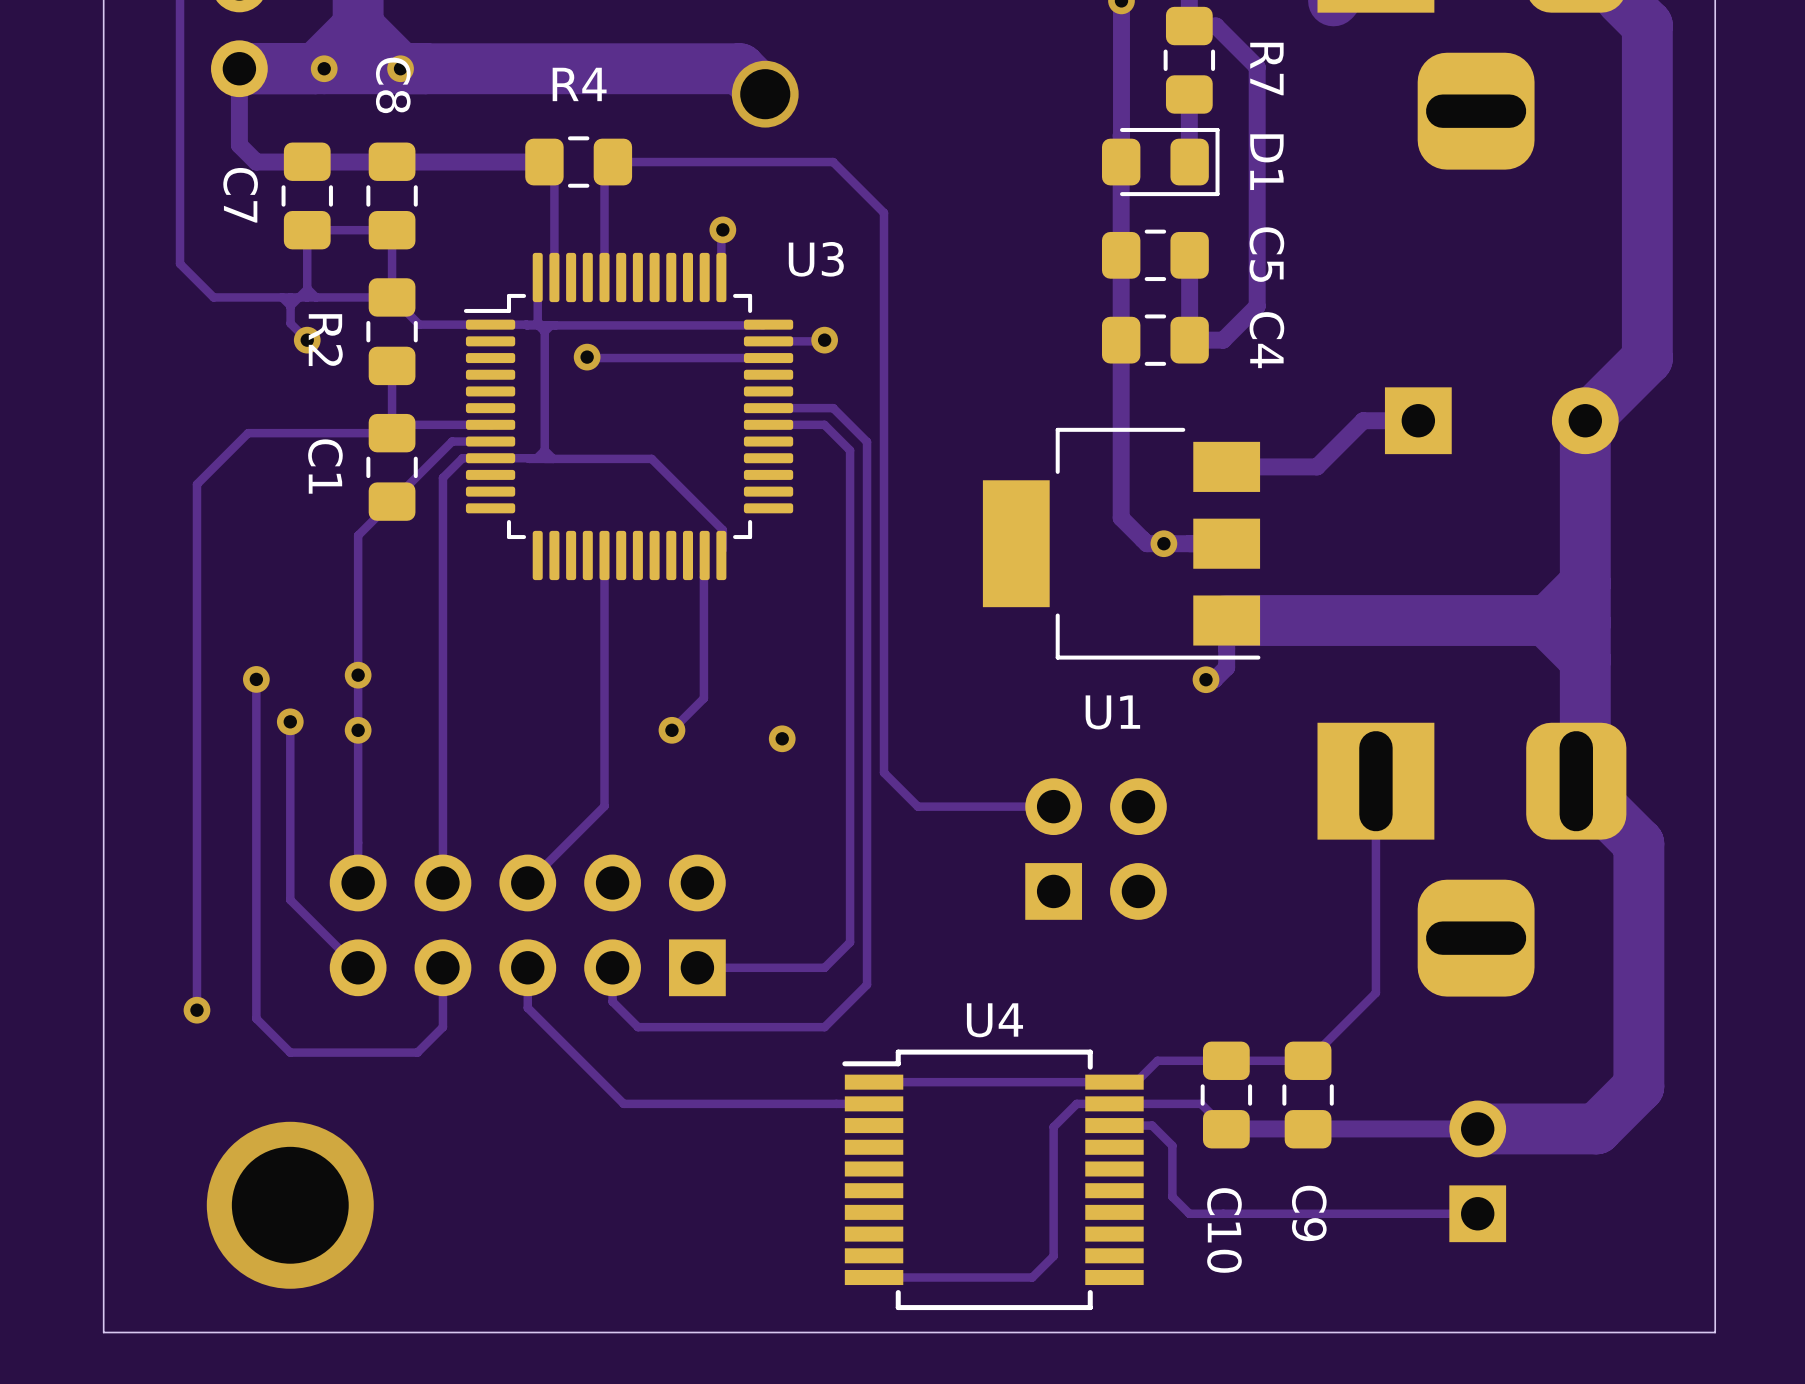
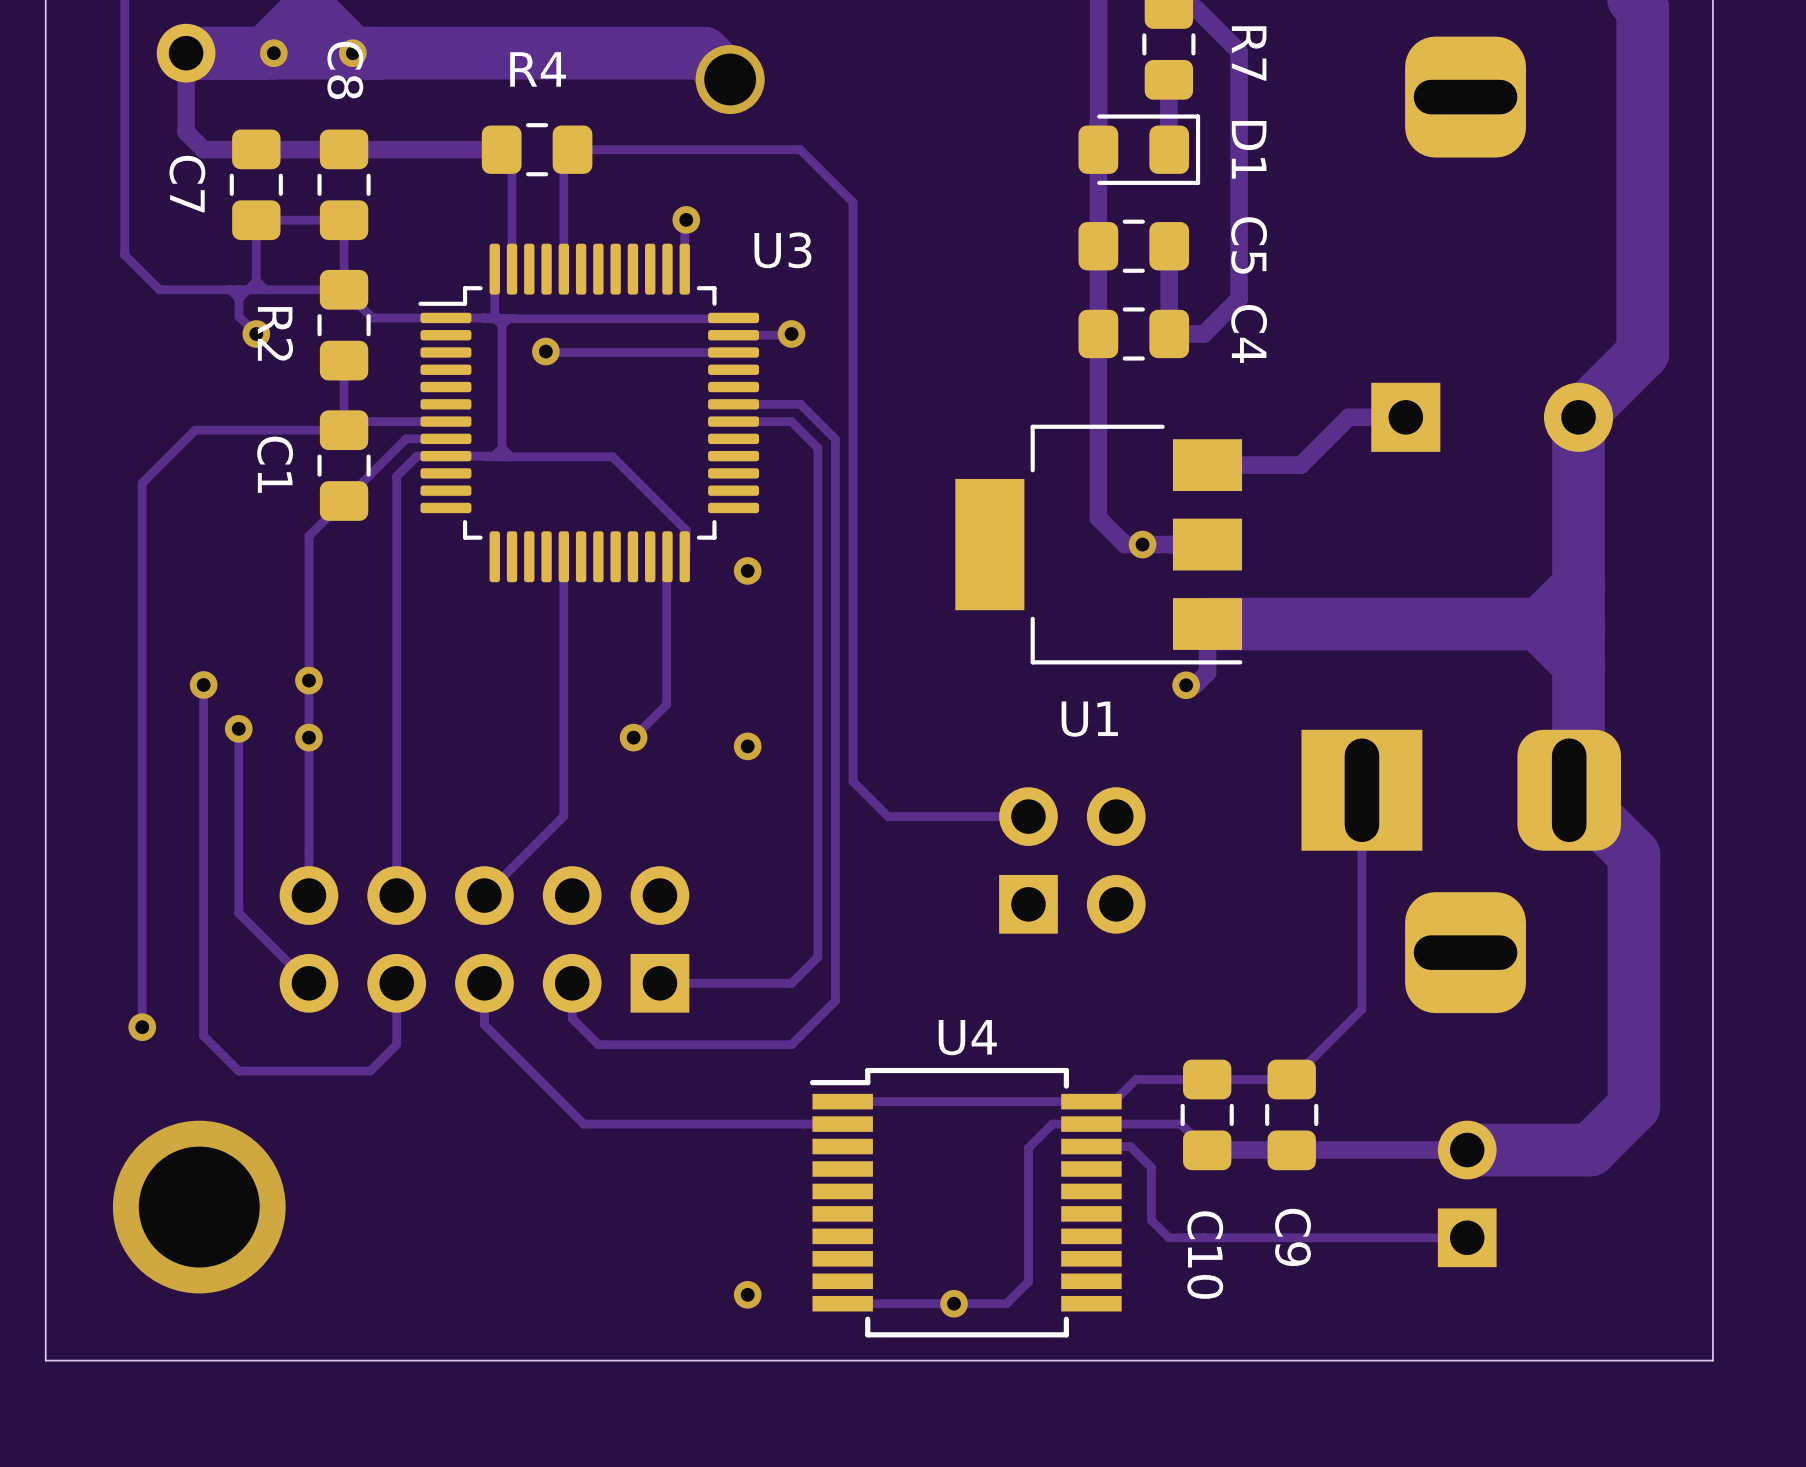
via: none -> (747, 570)
via position: (290, 1205) -> (199, 1207)
via: none -> (747, 1294)
via: none -> (954, 1303)

